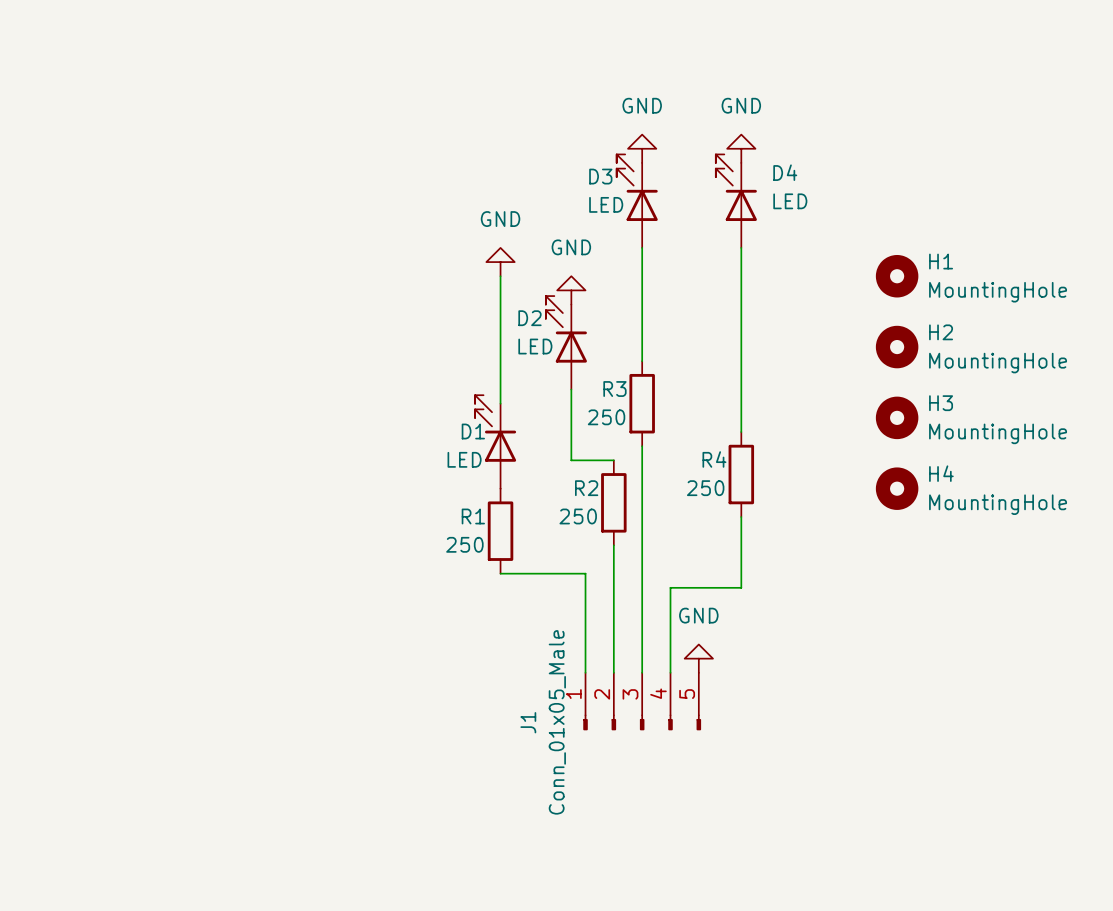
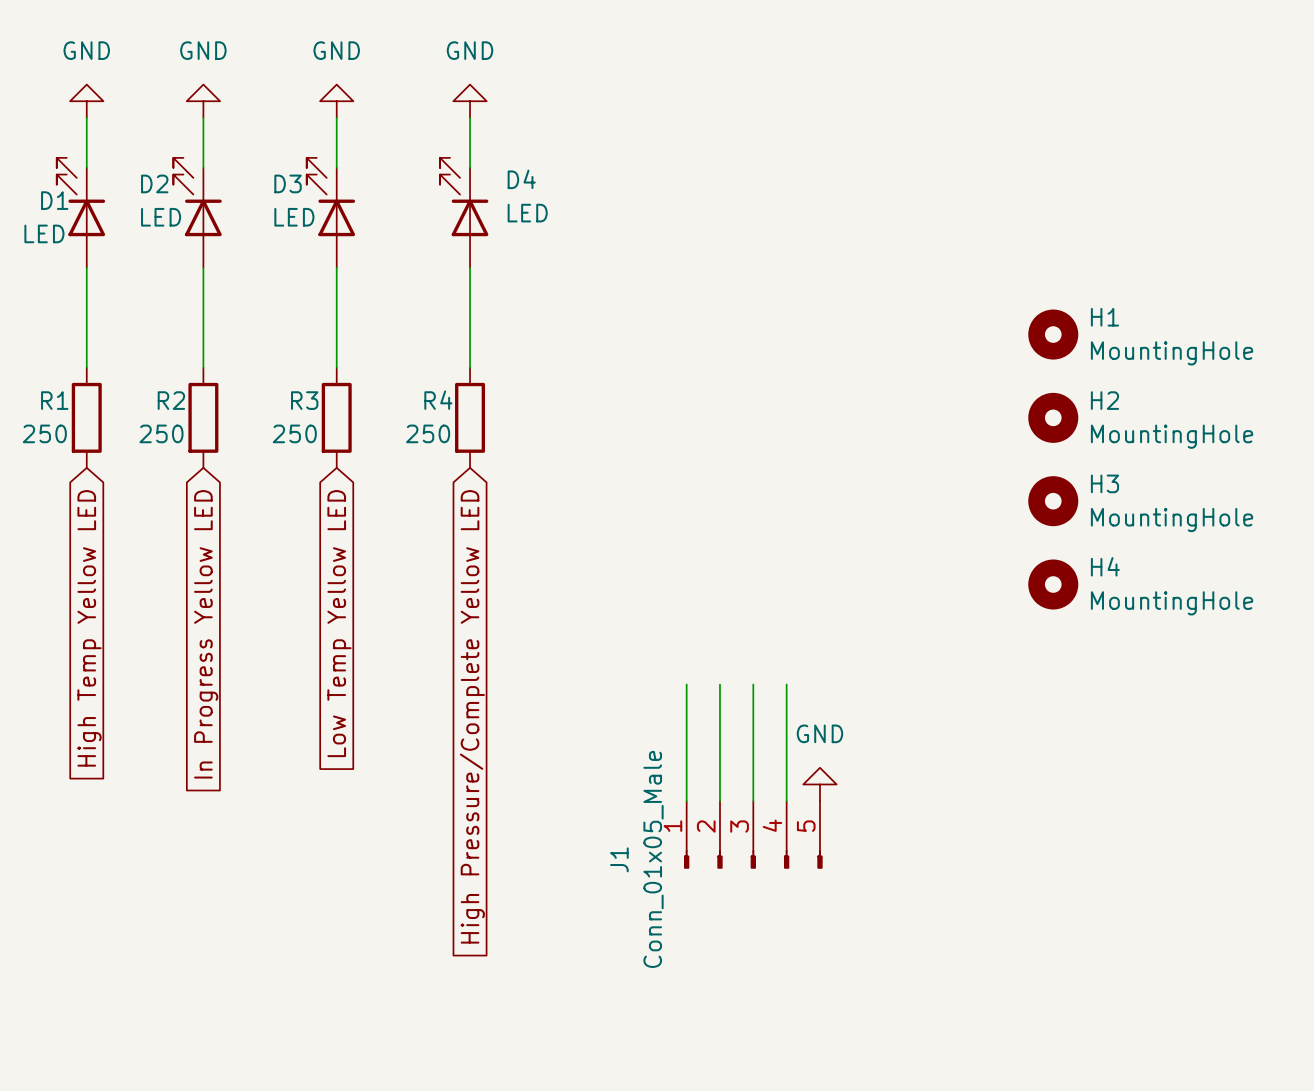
power symbol: none -> GND (86, 101)
power symbol: none -> GND (203, 101)
power symbol: none -> GND (336, 101)
power symbol: none -> GND (470, 101)
wire: none -> (86, 117) (86, 167)
wire: none -> (203, 117) (203, 167)
wire: none -> (336, 117) (336, 167)
wire: none -> (470, 117) (470, 167)
power symbol: GND (642, 148) -> none
power symbol: GND (741, 148) -> none
D3 position: (637, 201) -> (330, 212)
D4 position: (736, 201) -> (464, 212)
wire: none -> (86, 267) (86, 367)
wire: none -> (203, 267) (203, 367)
wire: none -> (336, 267) (336, 367)
wire: none -> (470, 267) (470, 367)
wire: (642, 247) (642, 361) -> none
wire: (741, 247) (741, 432) -> none
power symbol: GND (500, 262) -> none
wire: (500, 276) (500, 403) -> none
power symbol: GND (571, 290) -> none
D2 position: (566, 342) -> (197, 212)
wire: (571, 389) (571, 460) (613, 460) -> none
R3 position: (642, 403) -> (336, 417)
D1 position: (495, 441) -> (80, 212)
wire: (642, 446) (642, 573) -> none
R4 position: (741, 474) -> (470, 417)
R2 position: (613, 502) -> (203, 417)
wire: (741, 517) (741, 587) (670, 587) -> (786, 684) (786, 701)
global label: none -> Low Temp Yellow LED (339, 623)
global label: none -> High Temp Yellow LED (89, 628)
global label: none -> In Progress Yellow LED (206, 634)
R1 position: (500, 531) -> (86, 417)
wire: (613, 545) (613, 573) -> none
wire: (500, 573) (585, 573) -> none
global label: none -> High Pressure/Complete Yellow LED (472, 716)

